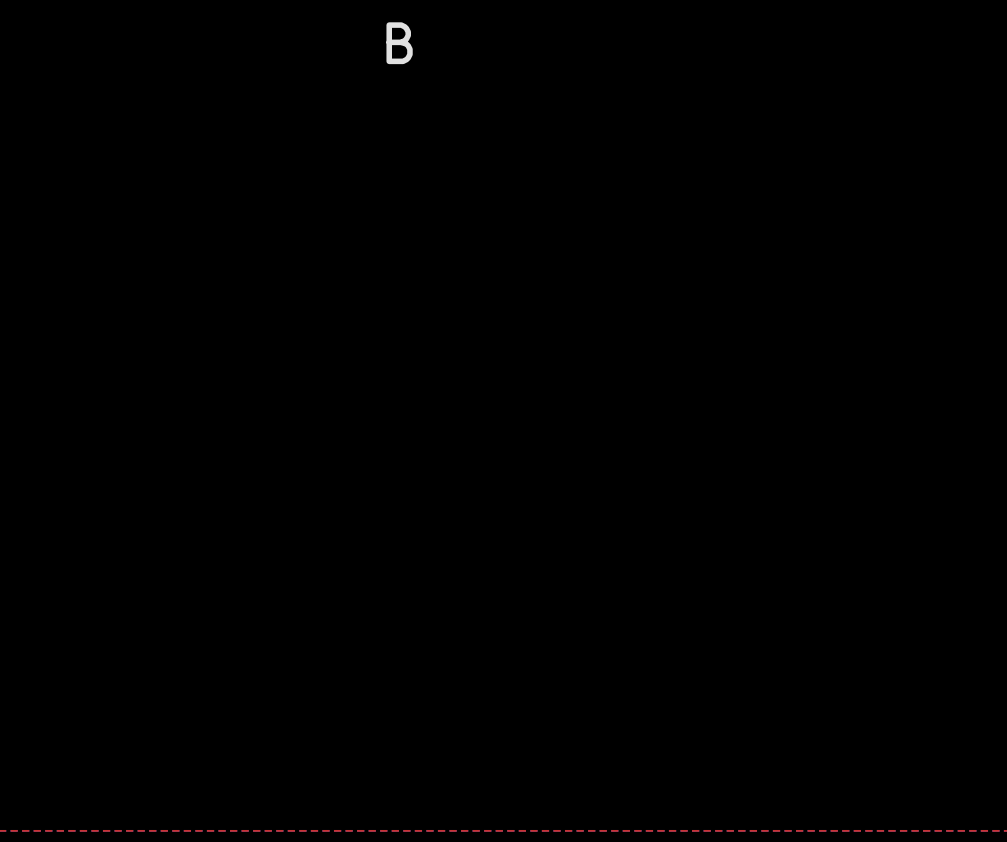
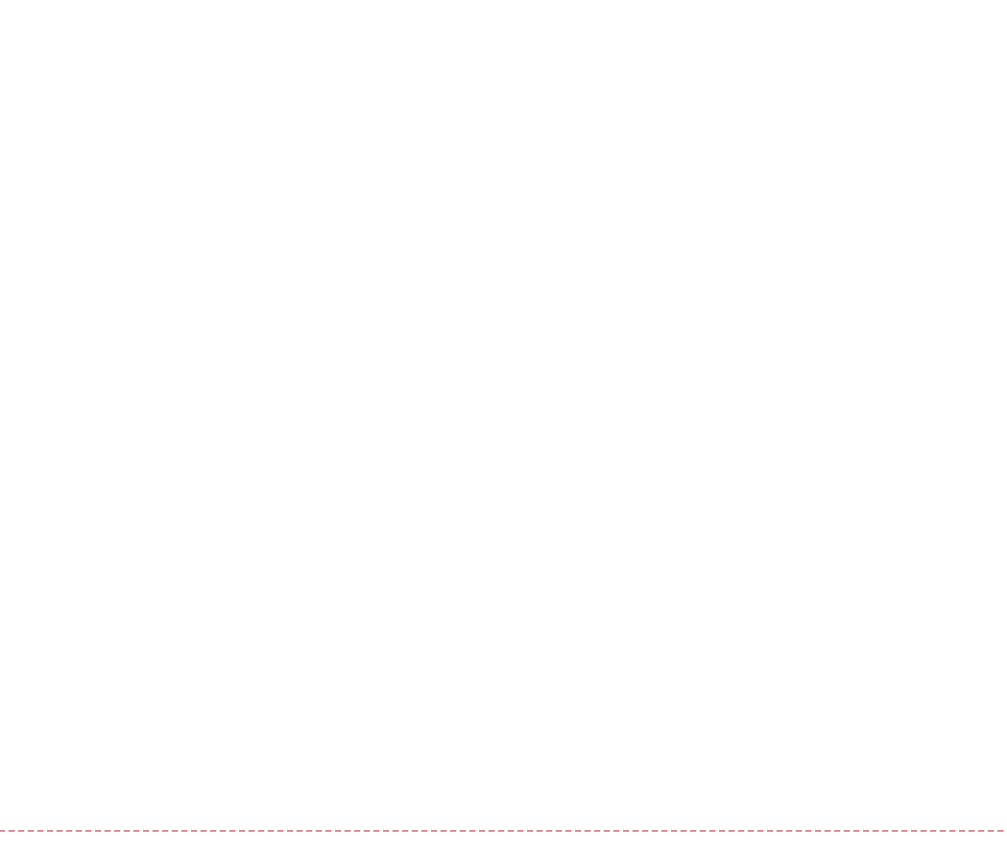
text: B (399, 43) -> none

